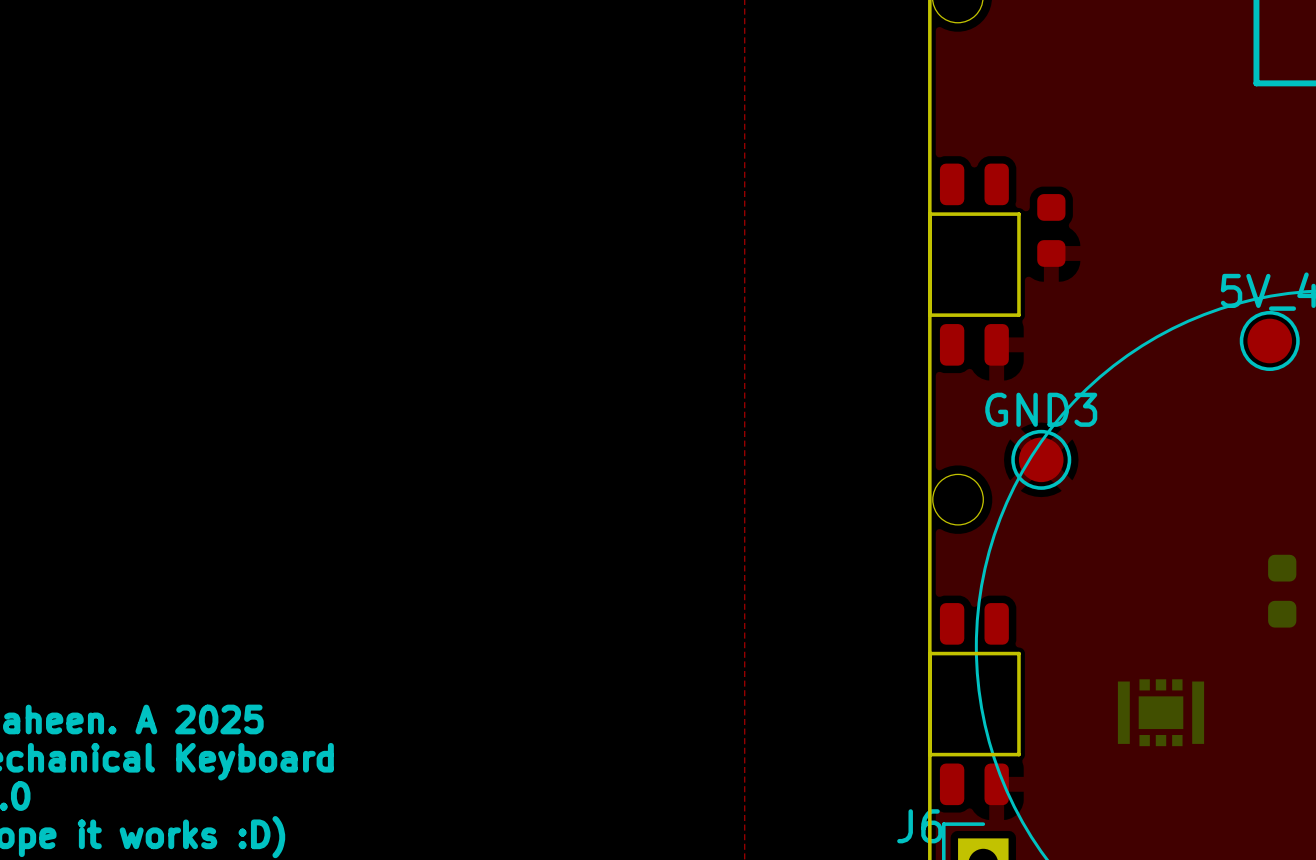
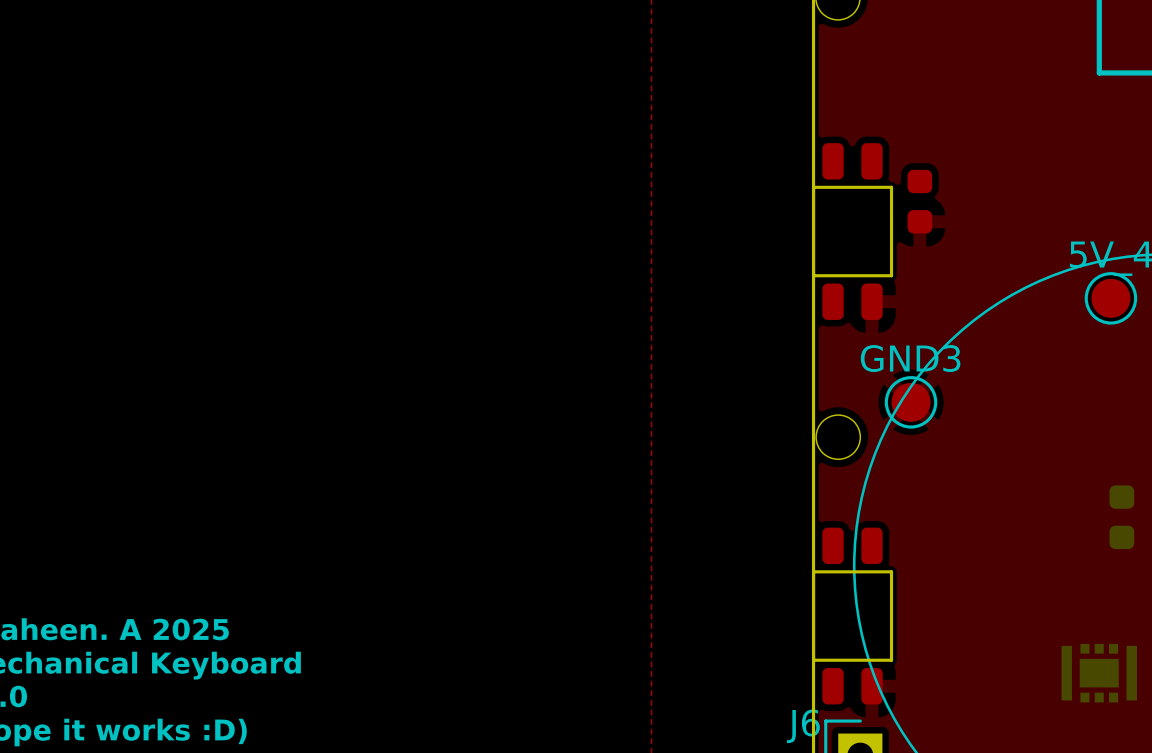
part position: (1161, 712) -> (1099, 673)

